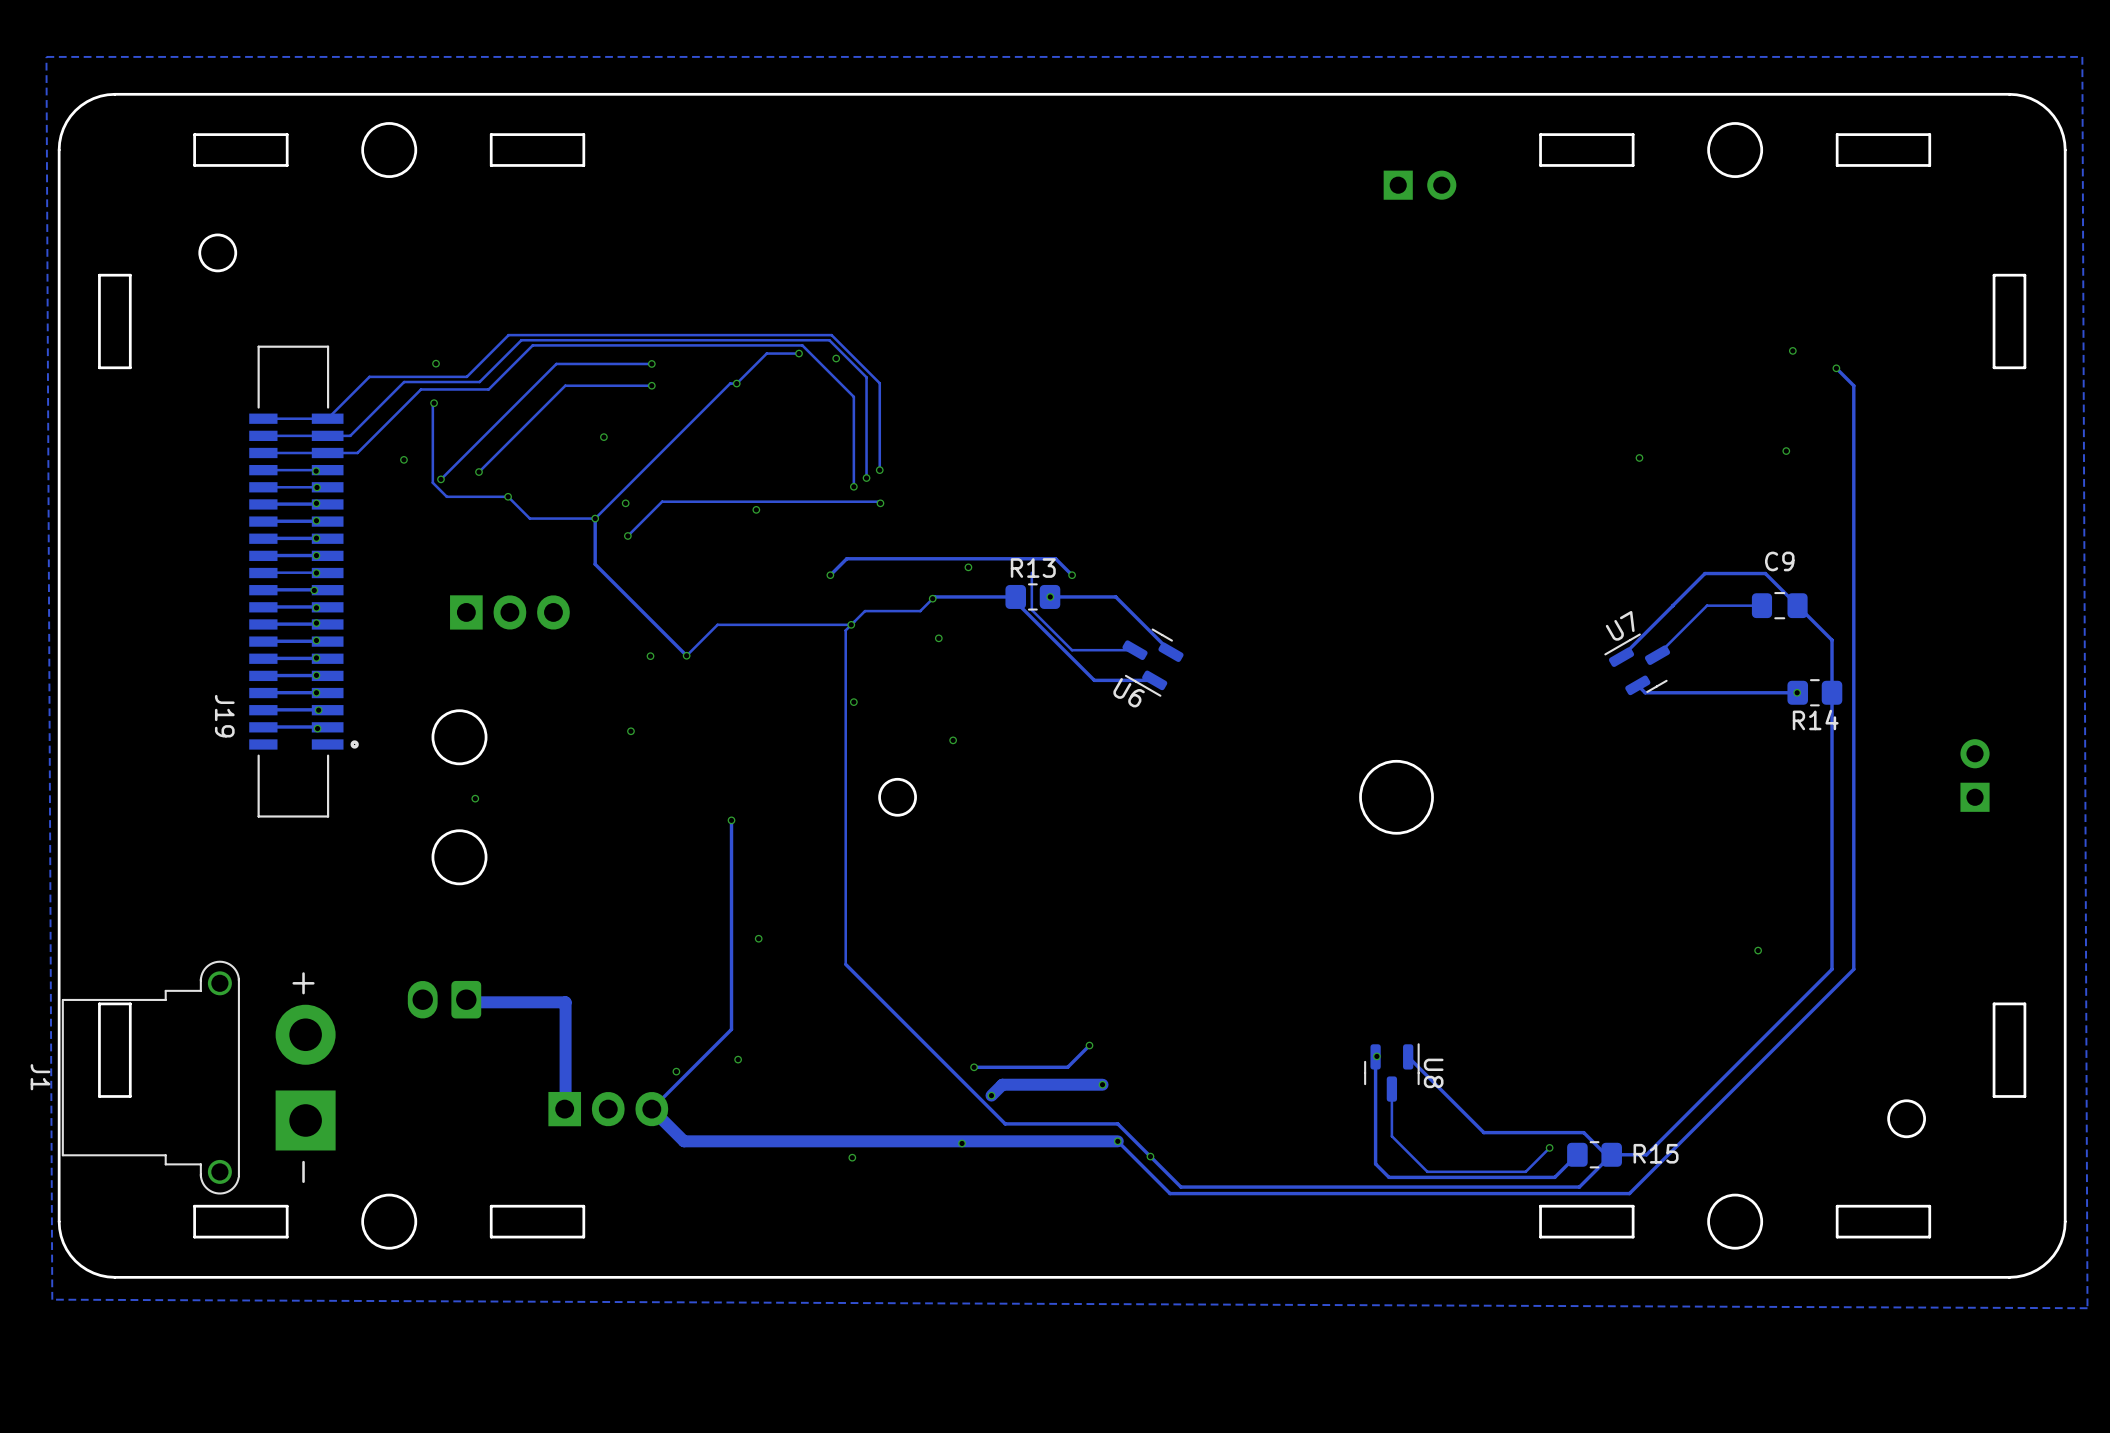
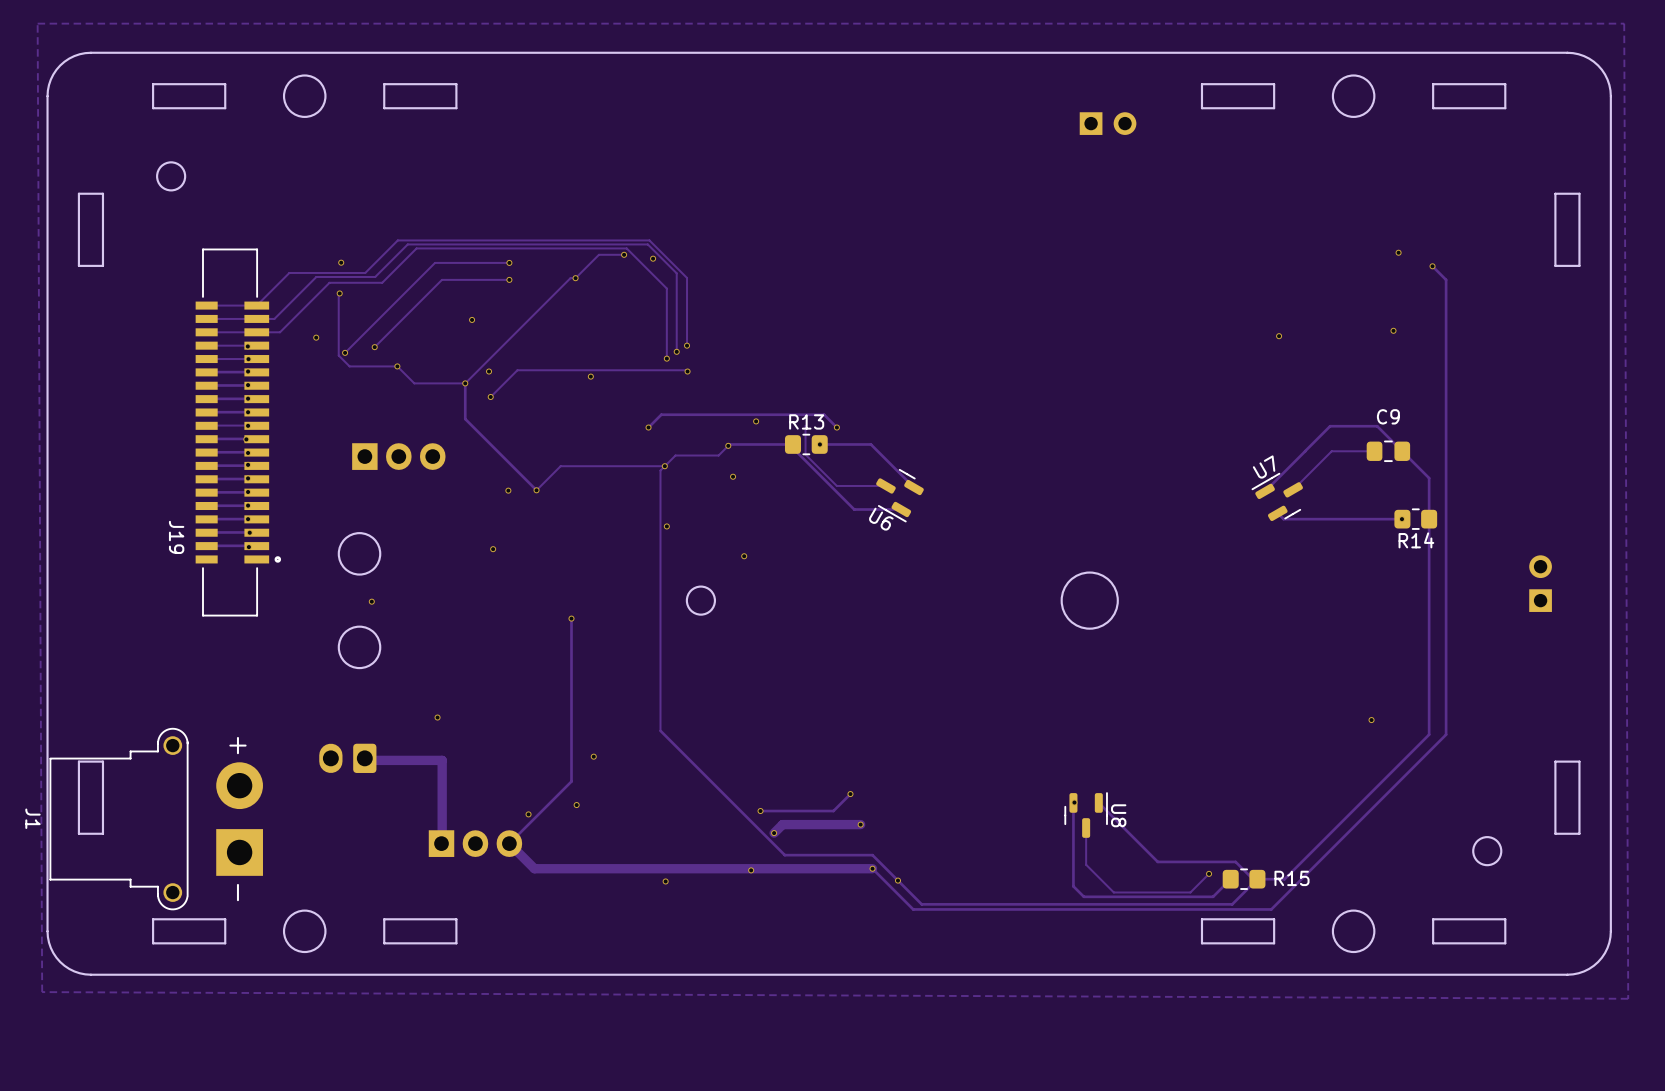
via position: (758, 938) -> (593, 756)
via: none -> (437, 717)

